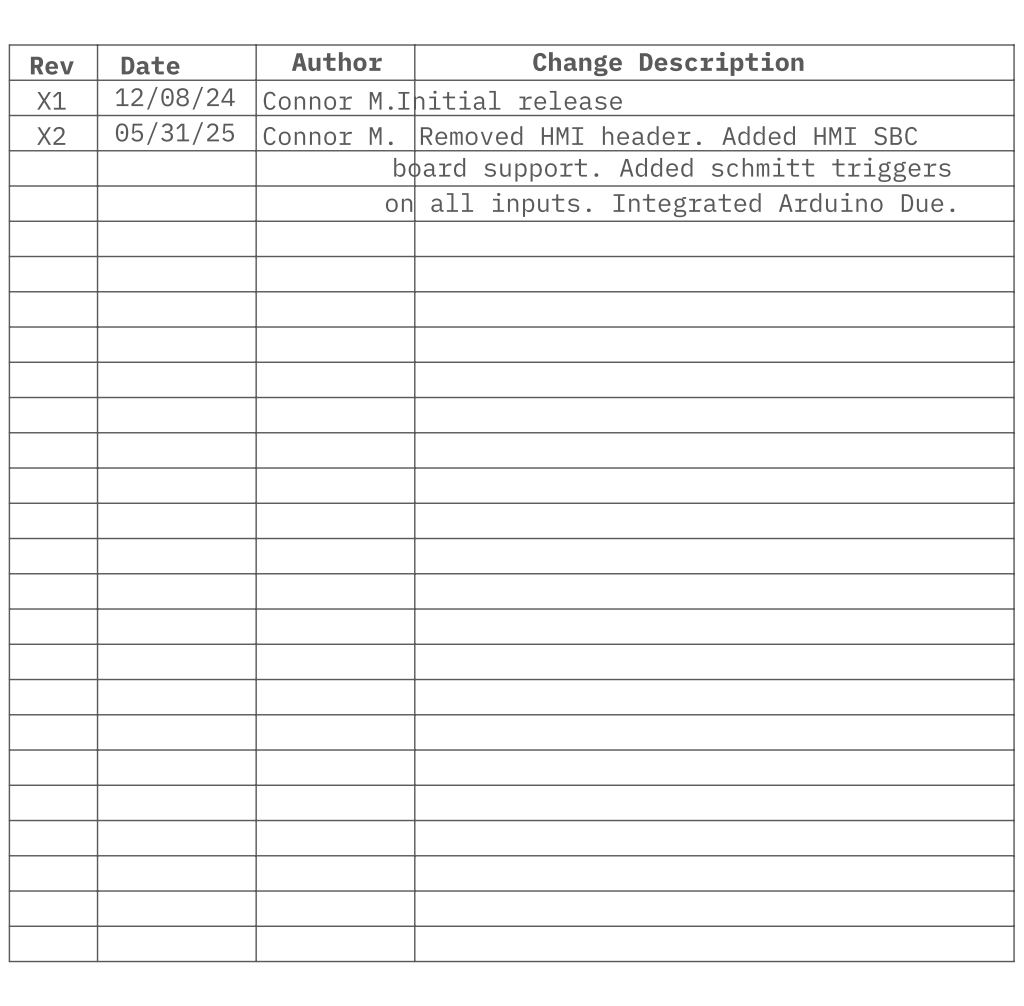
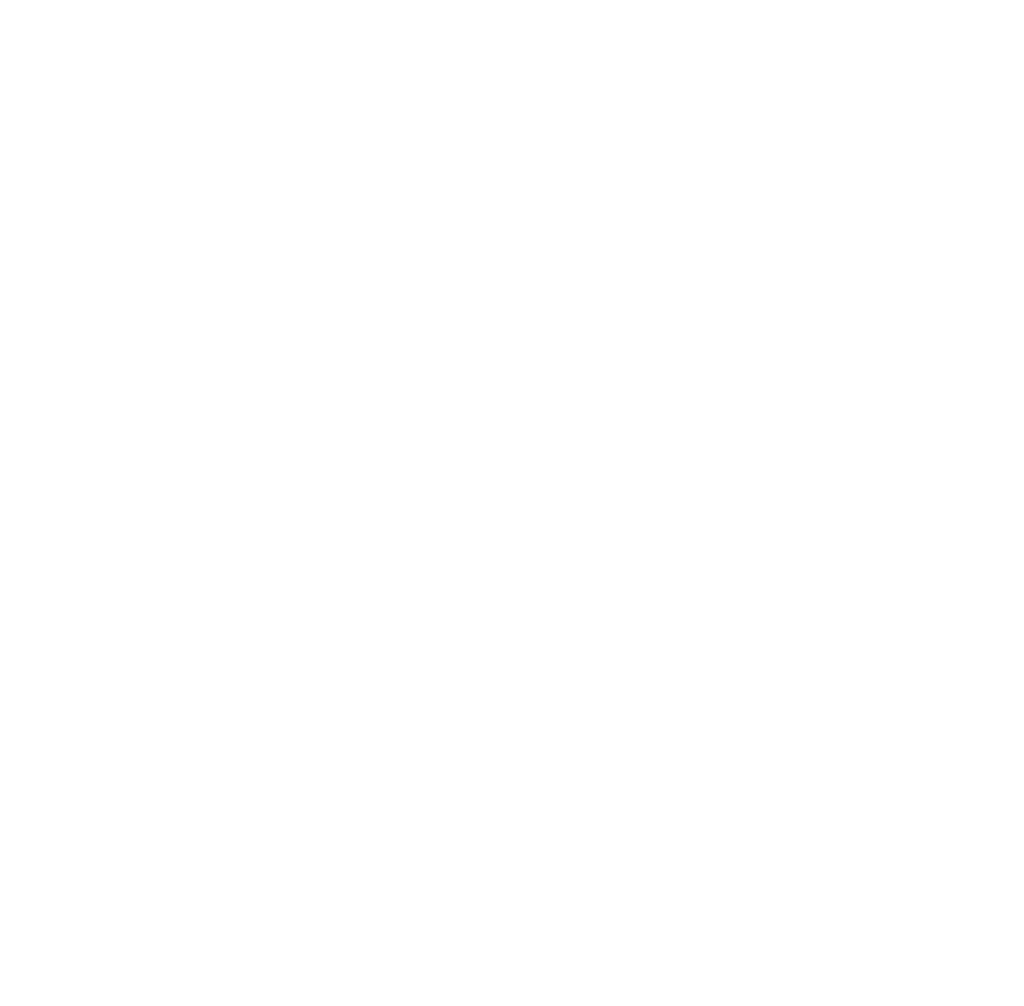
line: (9, 45) (1014, 45) (1014, 961) (9, 961) (9, 45) -> none
line: (97, 45) (97, 961) -> none
line: (256, 45) (256, 961) -> none
line: (414, 45) (414, 961) -> none
text: Author (336, 61) -> none
text: Change Description (668, 64) -> none
text: Rev (52, 65) -> none
text: Date (150, 65) -> none
line: (9, 80) (1014, 80) -> none
text: 12/08/24 (175, 98) -> none
text: X1 (51, 100) -> none
text: Connor M. (328, 100) -> none
text: Initial release (510, 100) -> none
line: (9, 115) (1014, 115) -> none
text: 05/31/25 (174, 133) -> none
text: X2 (51, 135) -> none
text: Removed HMI header. Added HMI SBC (668, 135) -> none
text: Connor M. (328, 136) -> none
line: (9, 150) (1014, 150) -> none
text: board support. Added schmitt triggers (672, 169) -> none
line: (9, 186) (1014, 186) -> none
text: on all inputs. Integrated Arduino Due. (670, 205) -> none
line: (9, 221) (1014, 221) -> none
line: (9, 256) (1014, 256) -> none
line: (9, 291) (1014, 291) -> none
line: (9, 327) (1014, 327) -> none
line: (9, 362) (1014, 362) -> none
line: (9, 397) (1014, 397) -> none
line: (9, 432) (1014, 432) -> none
line: (9, 468) (1014, 468) -> none
line: (9, 503) (1014, 503) -> none
line: (9, 538) (1014, 538) -> none
line: (9, 573) (1014, 573) -> none
line: (9, 609) (1014, 609) -> none
line: (9, 644) (1014, 644) -> none
line: (9, 679) (1014, 679) -> none
line: (9, 714) (1014, 714) -> none
line: (9, 750) (1014, 750) -> none
line: (9, 785) (1014, 785) -> none
line: (9, 820) (1014, 820) -> none
line: (9, 855) (1014, 855) -> none
line: (9, 891) (1014, 891) -> none
line: (9, 926) (1014, 926) -> none

